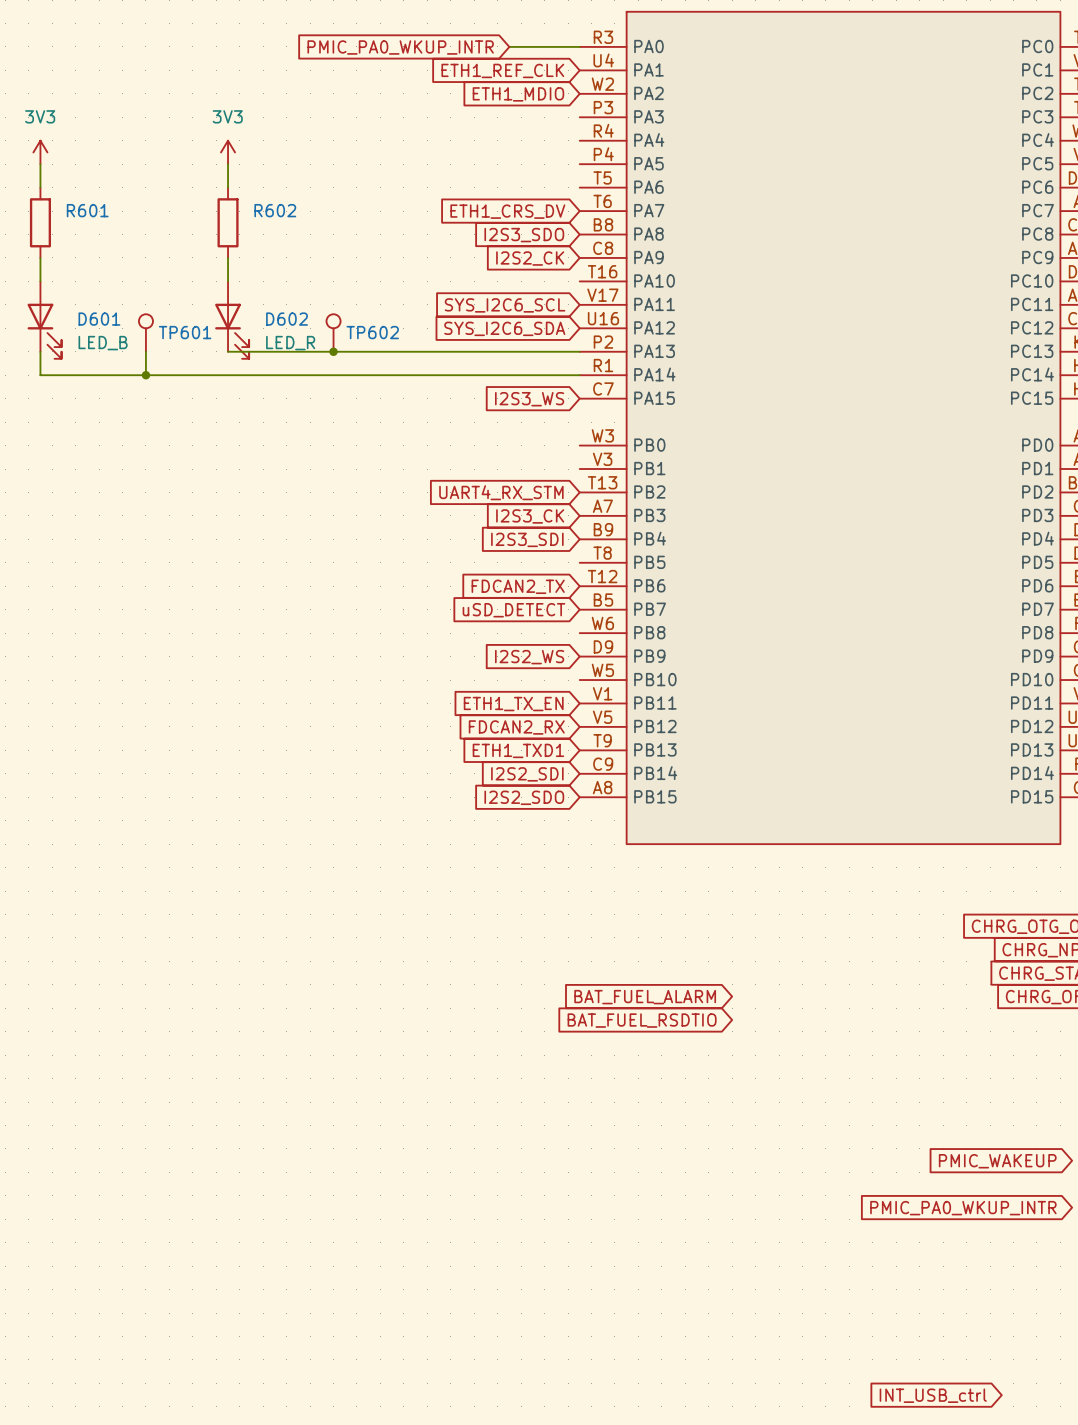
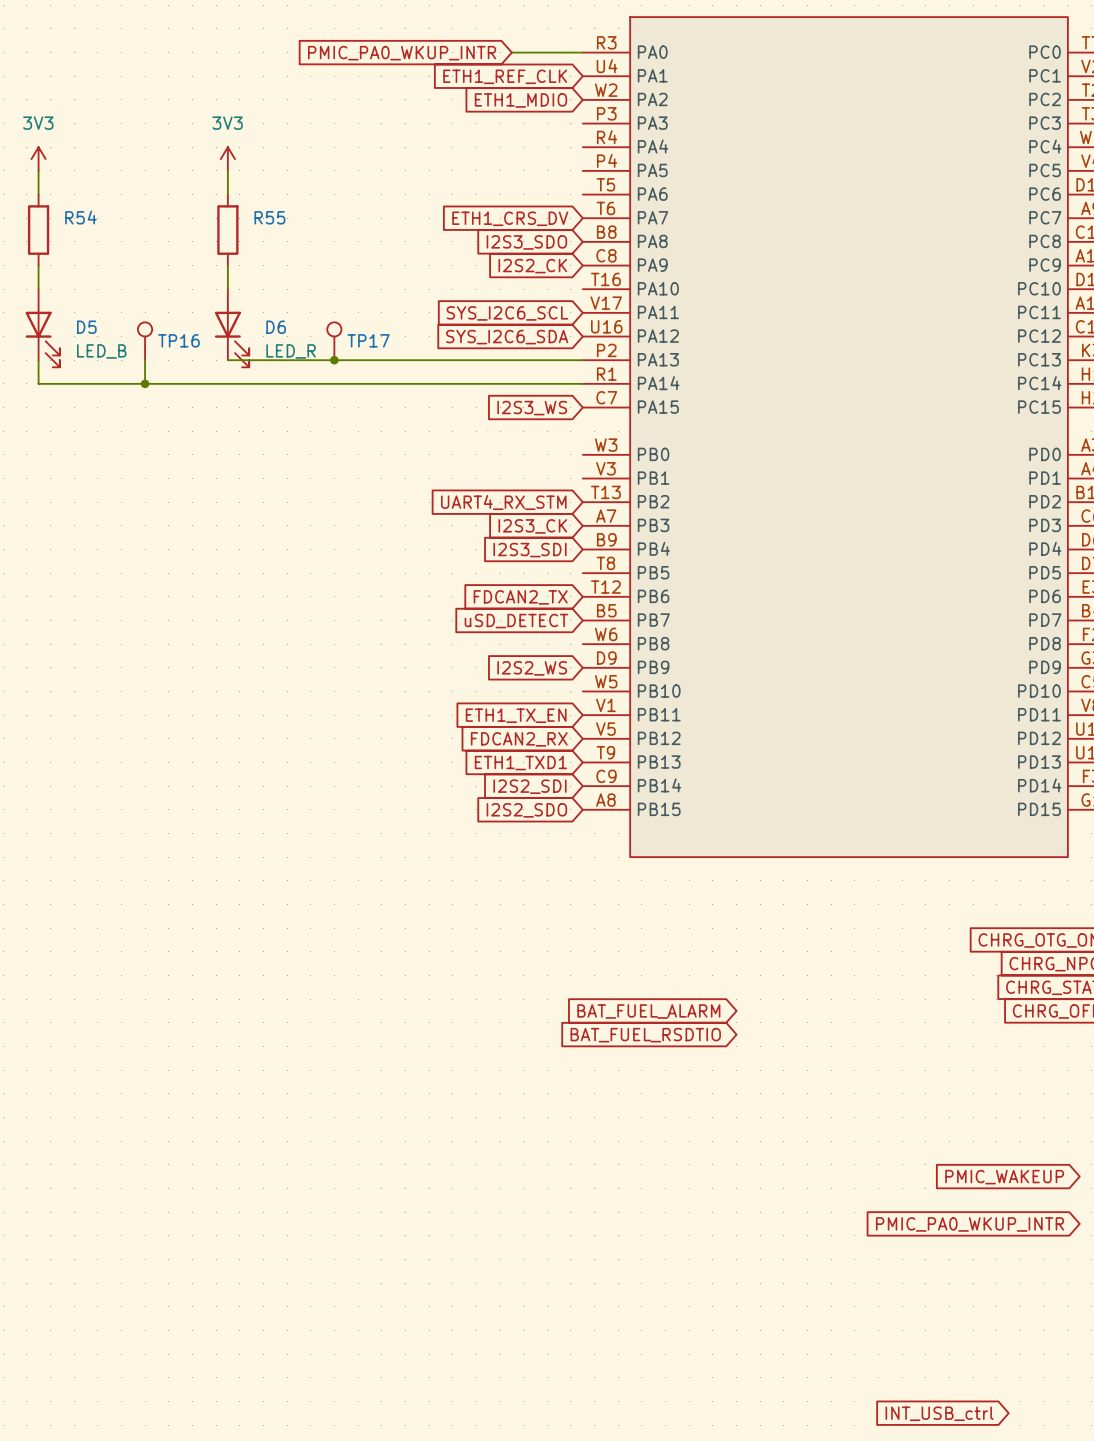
R601 name: R601 (87, 210) -> R54 (80, 217)
R602 name: R602 (275, 210) -> R55 (269, 217)
D601 name: D601 (99, 319) -> D5 (86, 327)
D602 name: D602 (287, 319) -> D6 (276, 327)
TP601 name: TP601 (185, 332) -> TP16 (178, 340)
TP602 name: TP602 (372, 332) -> TP17 (368, 340)

